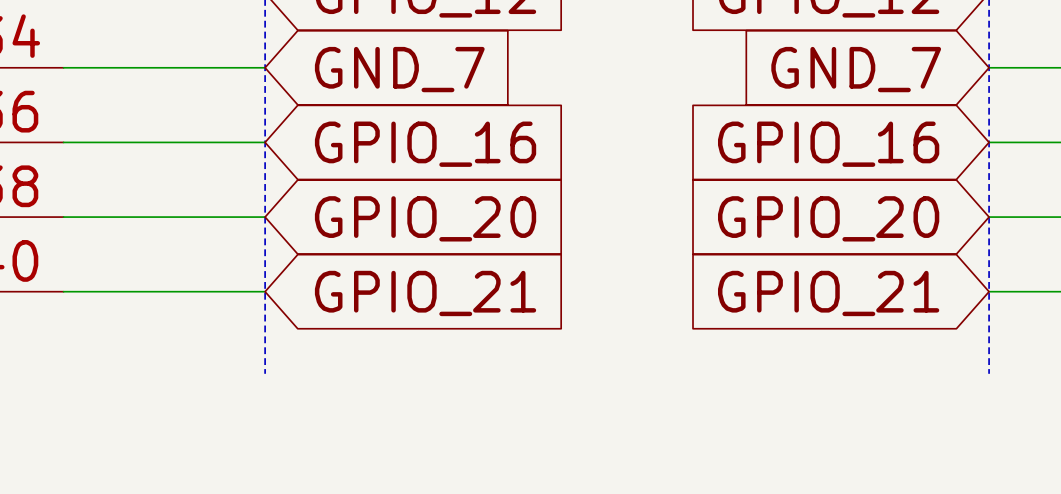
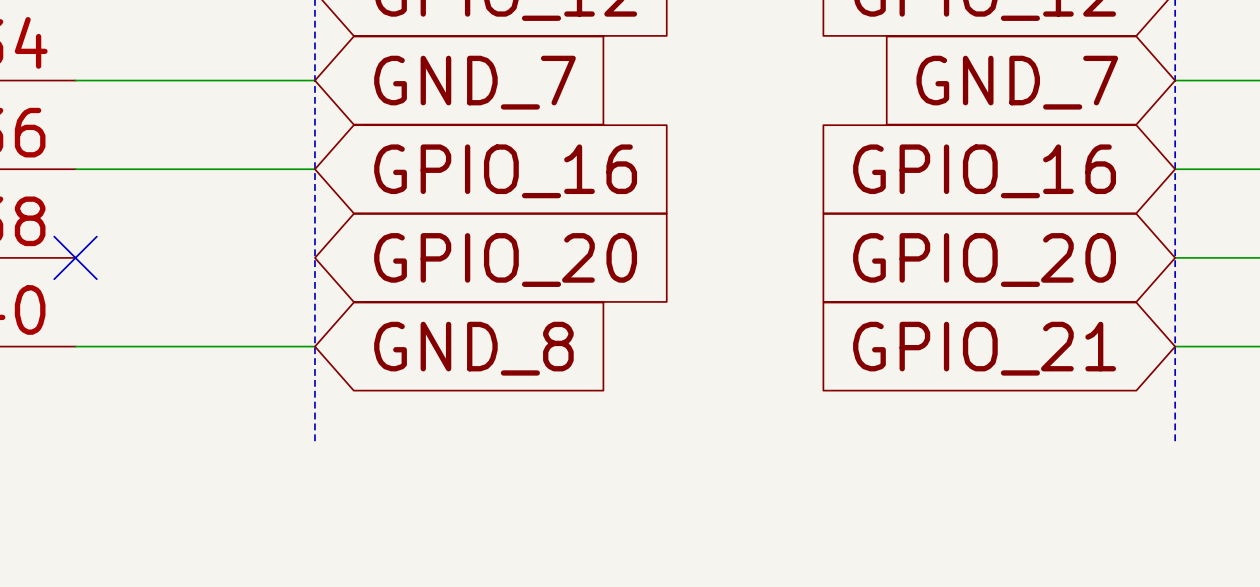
wire: (63, 217) (265, 217) -> none
no-connect mark: none -> (75, 257)
global label: GPIO_21 (425, 293) -> GND_8 (473, 348)

